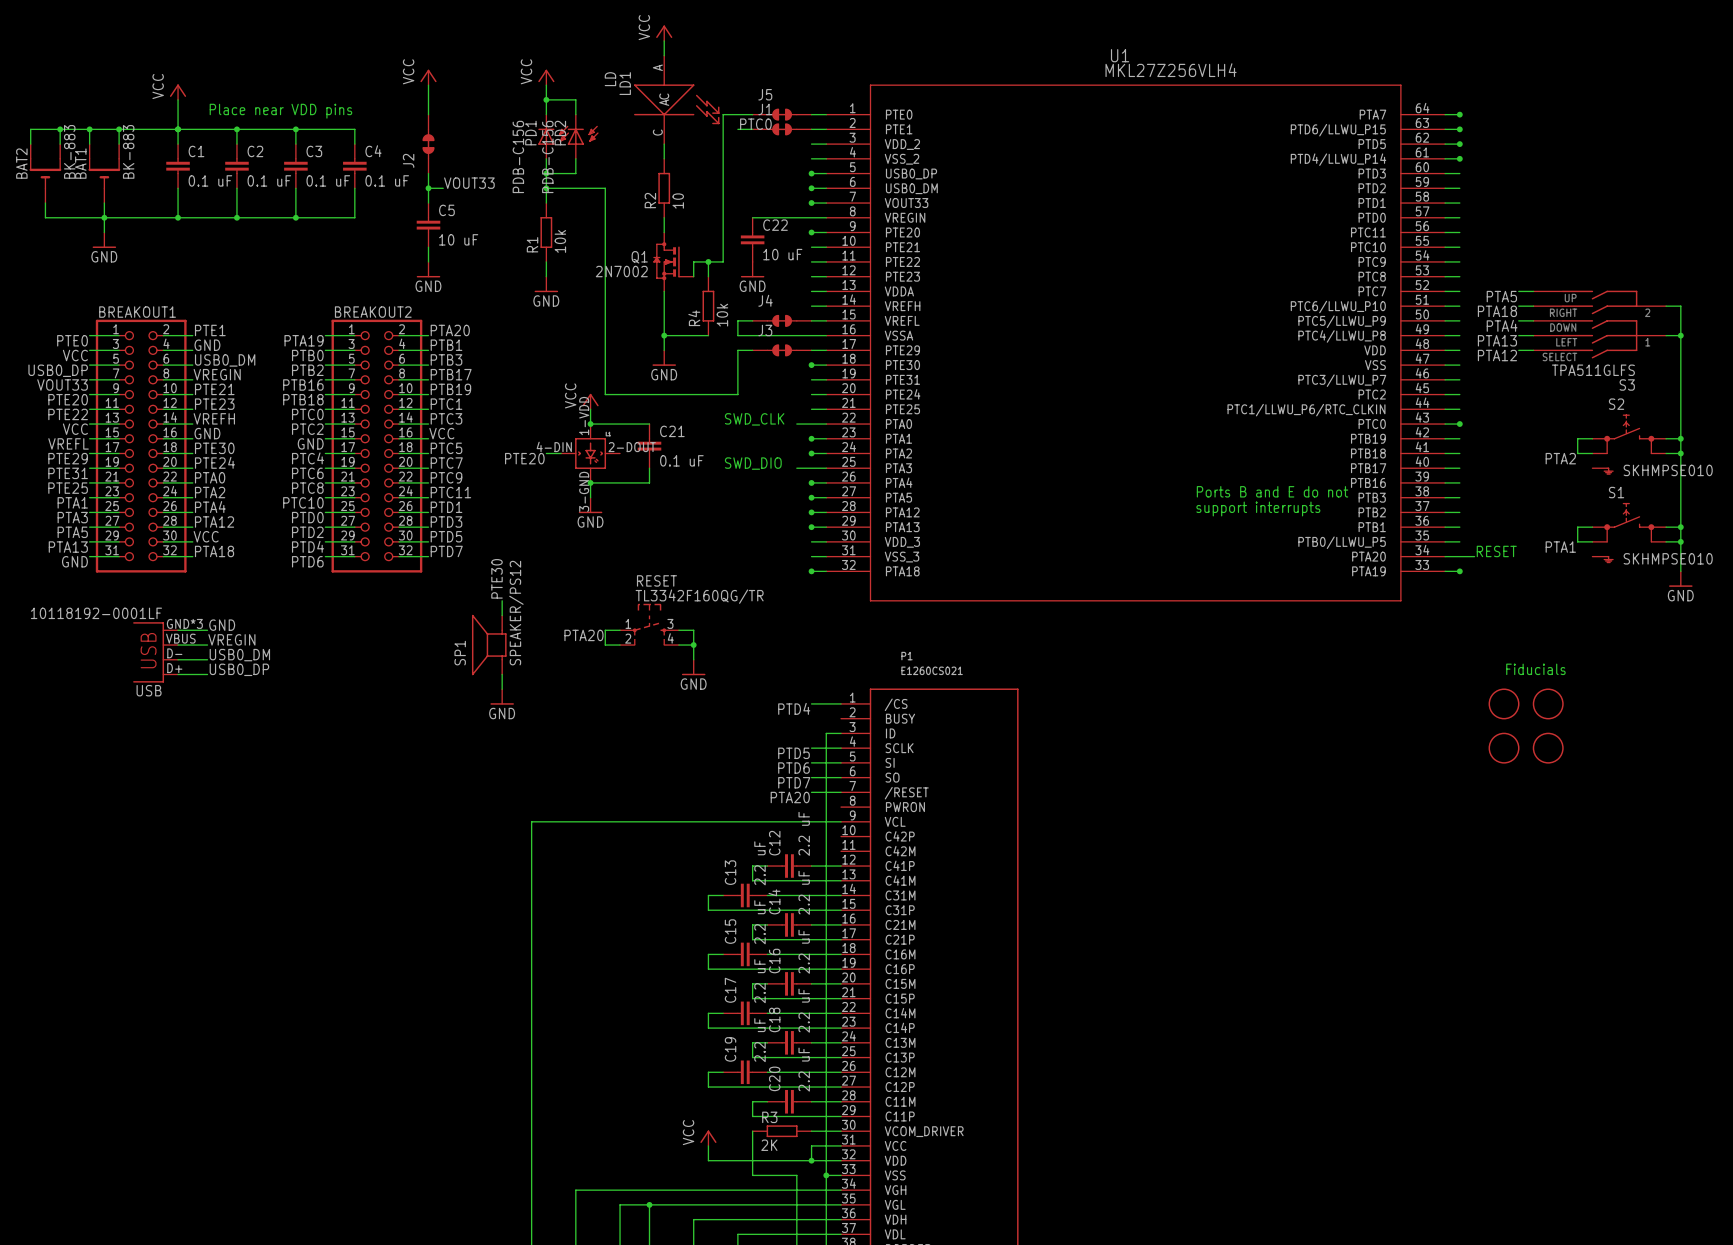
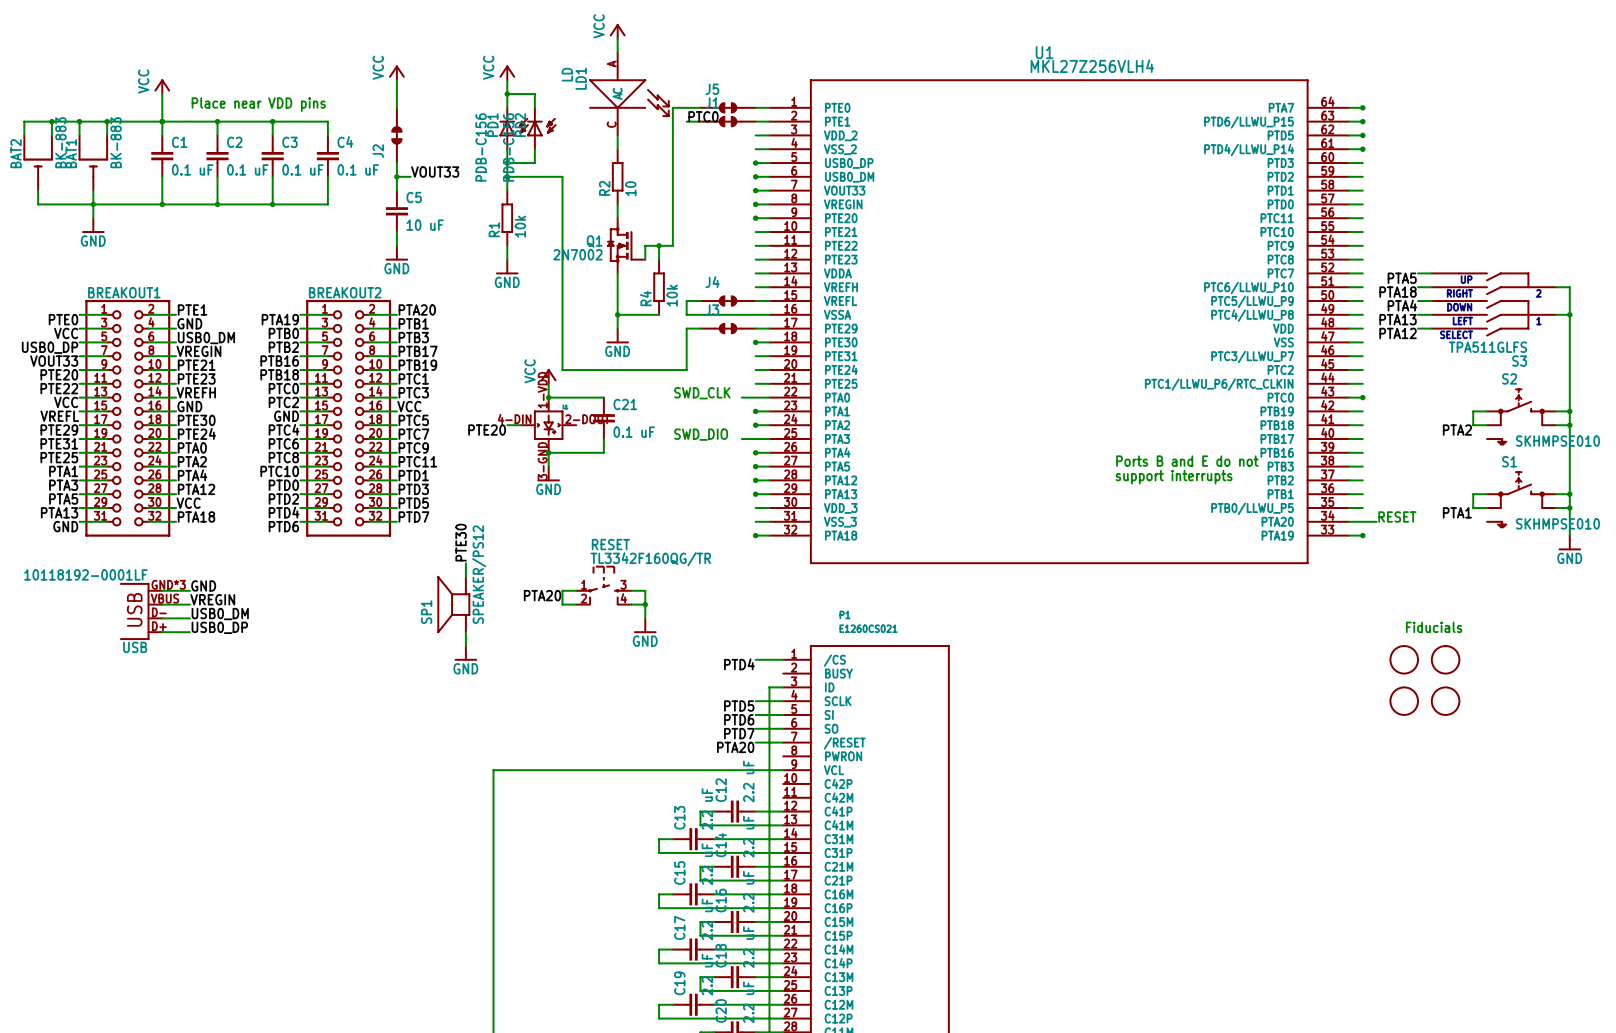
wire: (752, 217) (811, 217) -> none
junction: none -> (755, 204)
C22: 10 uF (752, 239) -> none
power symbol: GND (752, 269) -> none

